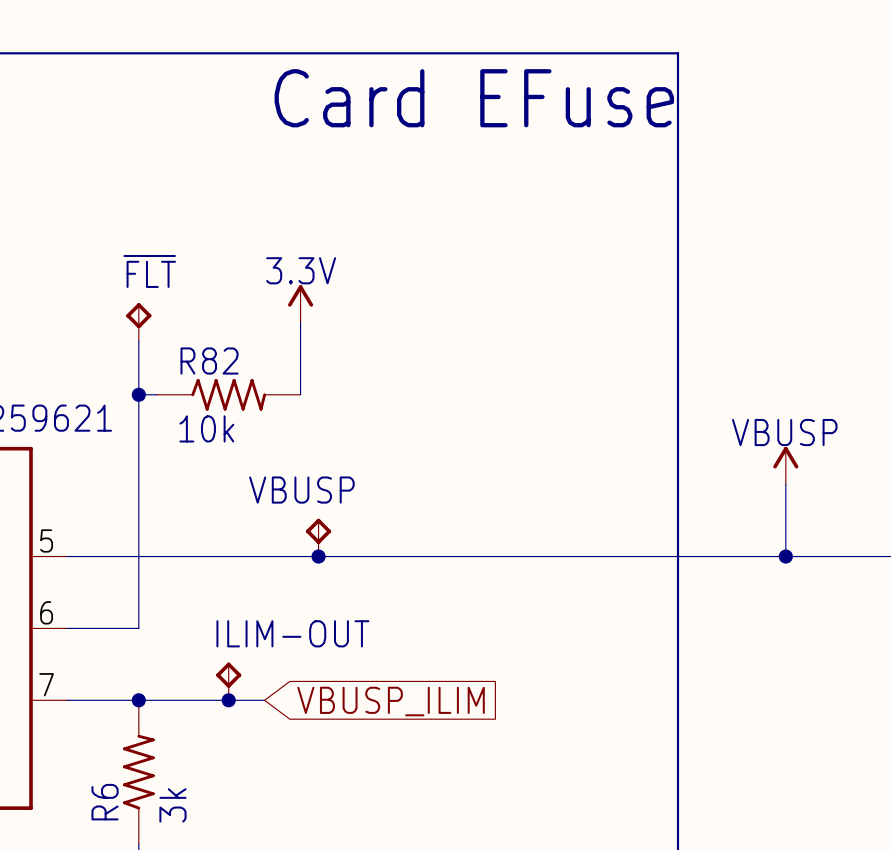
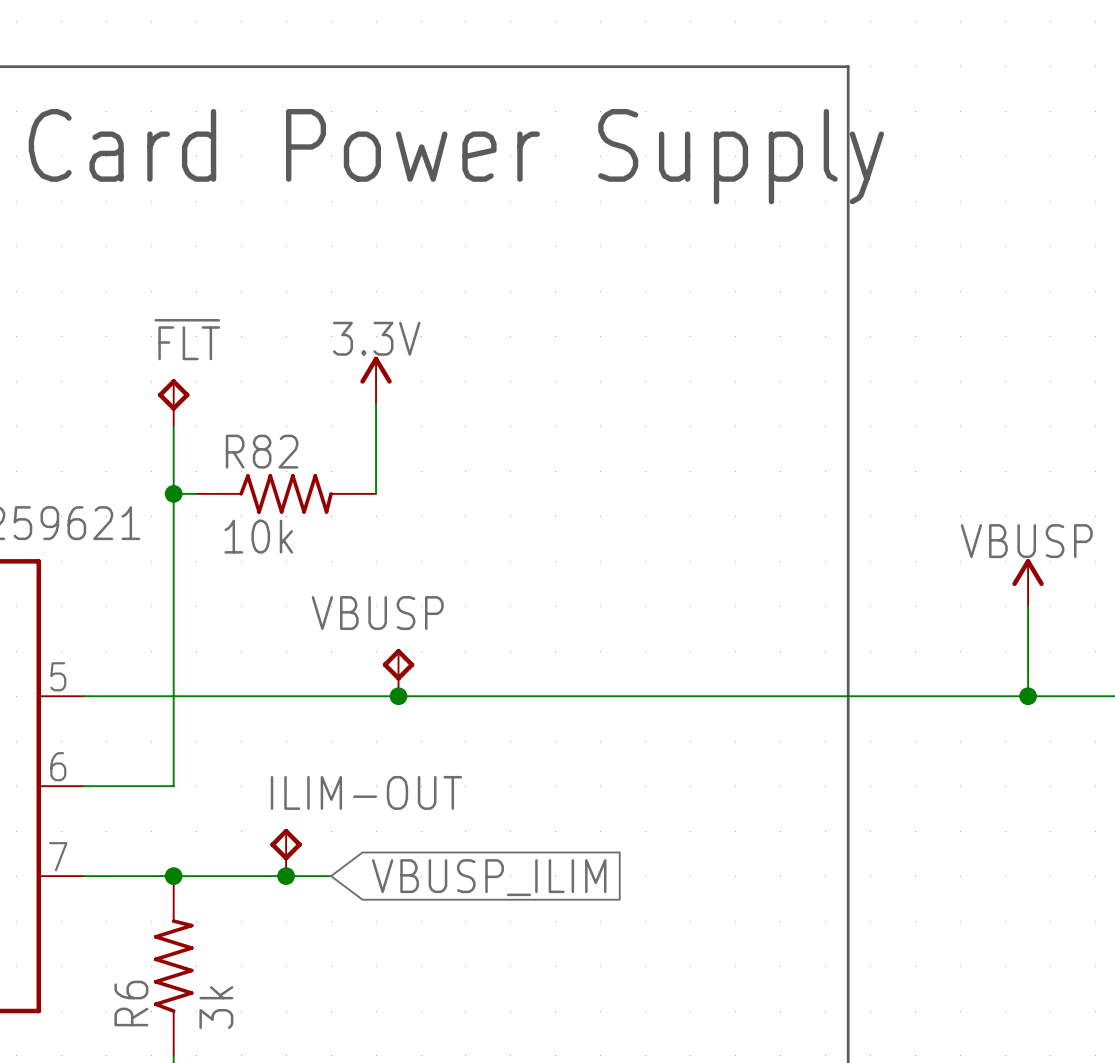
text: Card EFuse (474, 98) -> none
text: none -> Card Power Supply (456, 156)
power symbol position: VBUSP (785, 465) -> VBUSP (1028, 582)
wire: (785, 484) (785, 556) -> (1028, 606) (1028, 696)
junction position: (785, 556) -> (1028, 696)

